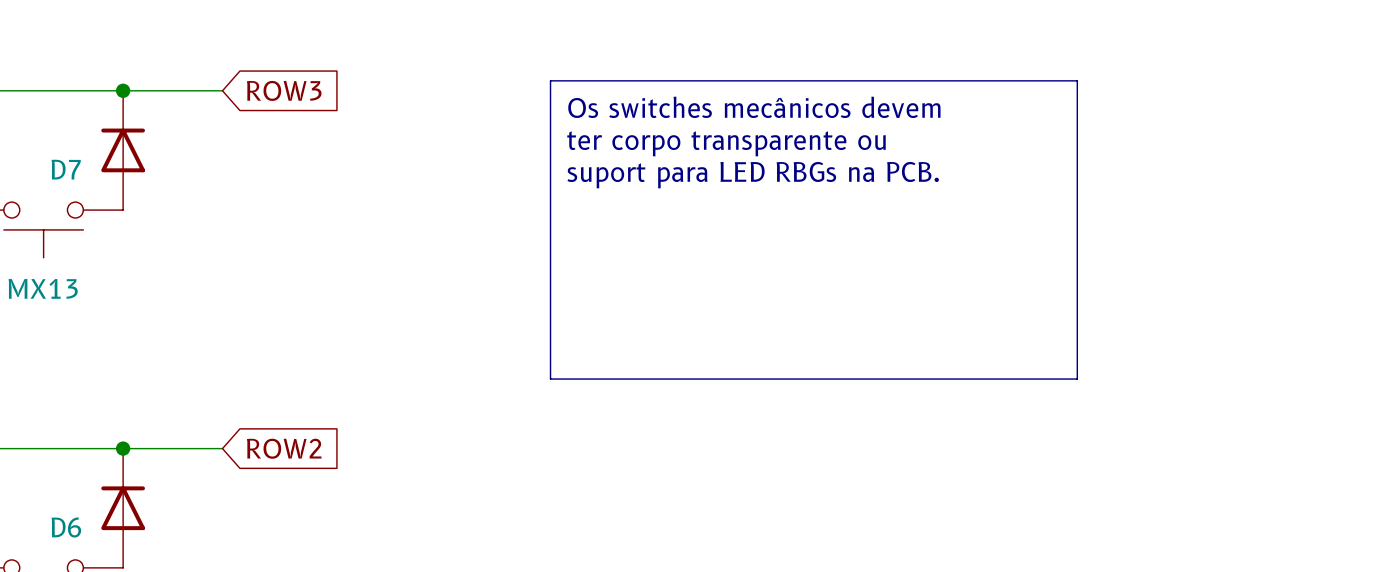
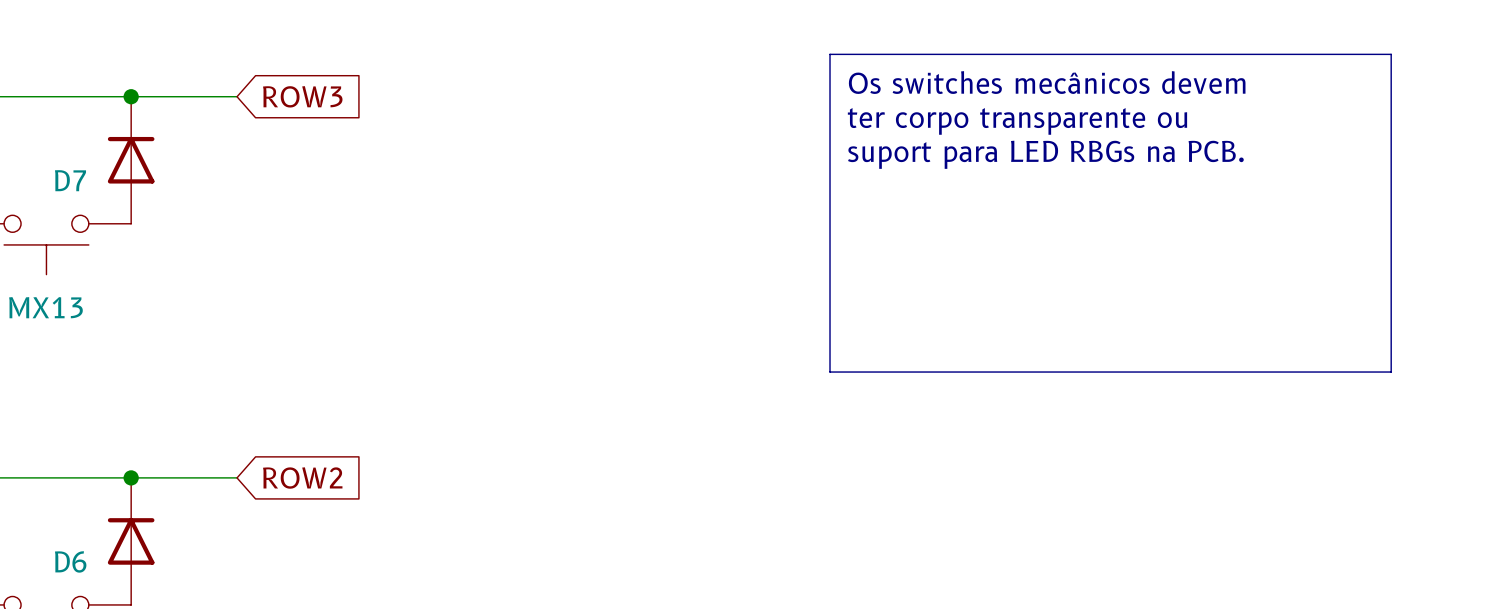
line: (550, 80) (1077, 80) (1077, 379) (550, 379) (550, 80) -> (830, 54) (1391, 54) (1391, 372) (830, 372) (830, 54)
text position: Os switches mecânicos devem (754, 107) -> Os switches mecânicos devem (1047, 82)
text position: ter corpo transparente ou (726, 143) -> ter corpo transparente ou (1017, 121)
text position: suport para LED RBGs na PCB. (753, 175) -> suport para LED RBGs na PCB. (1045, 154)

